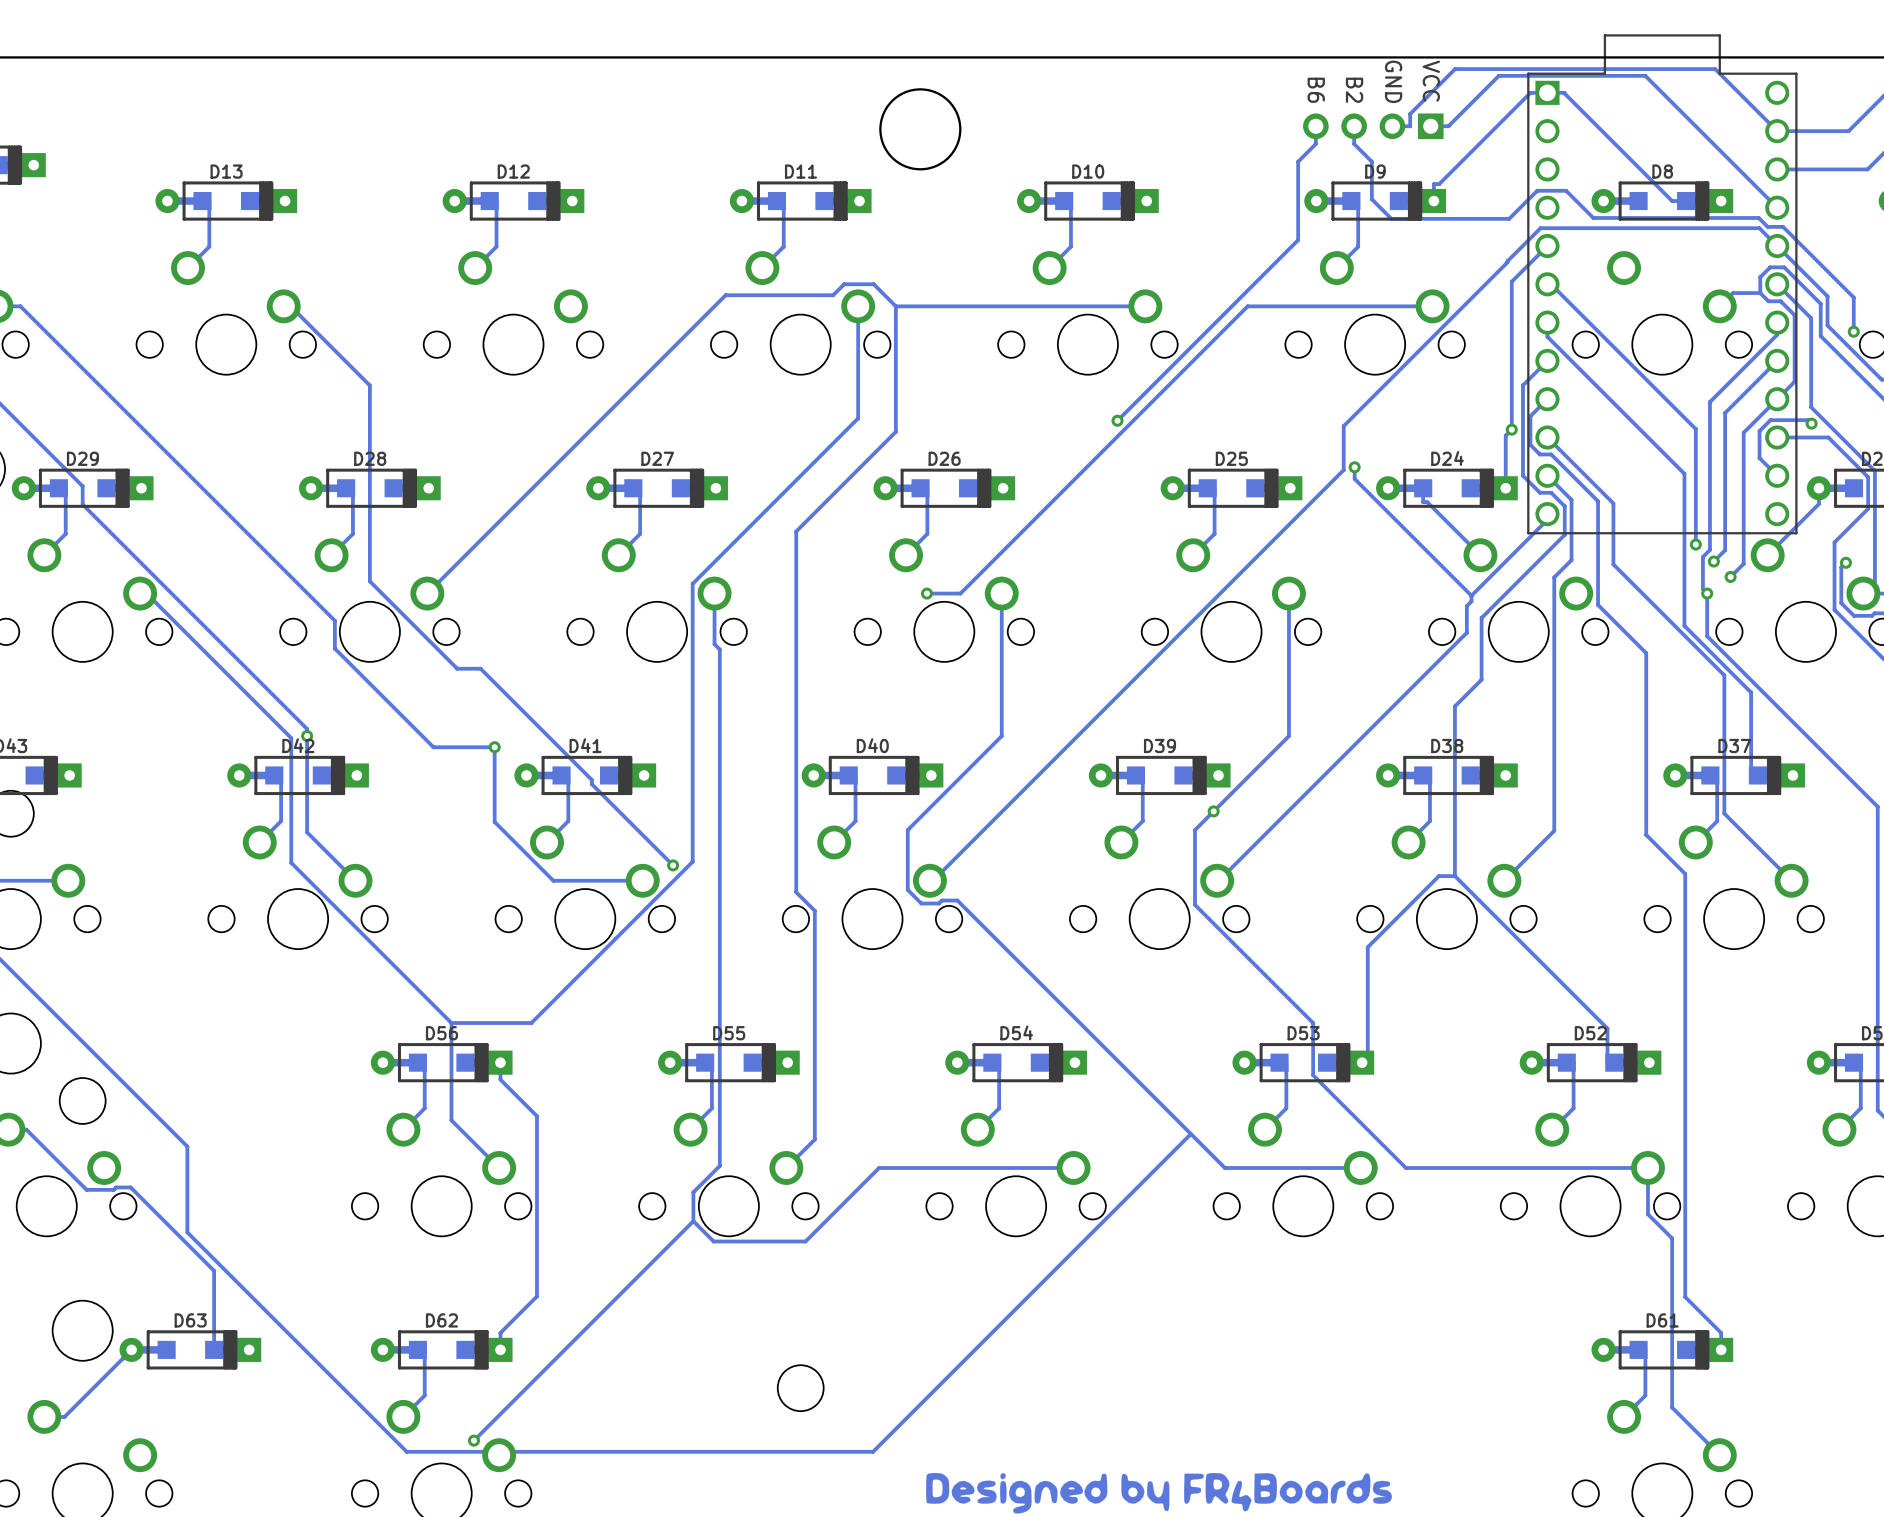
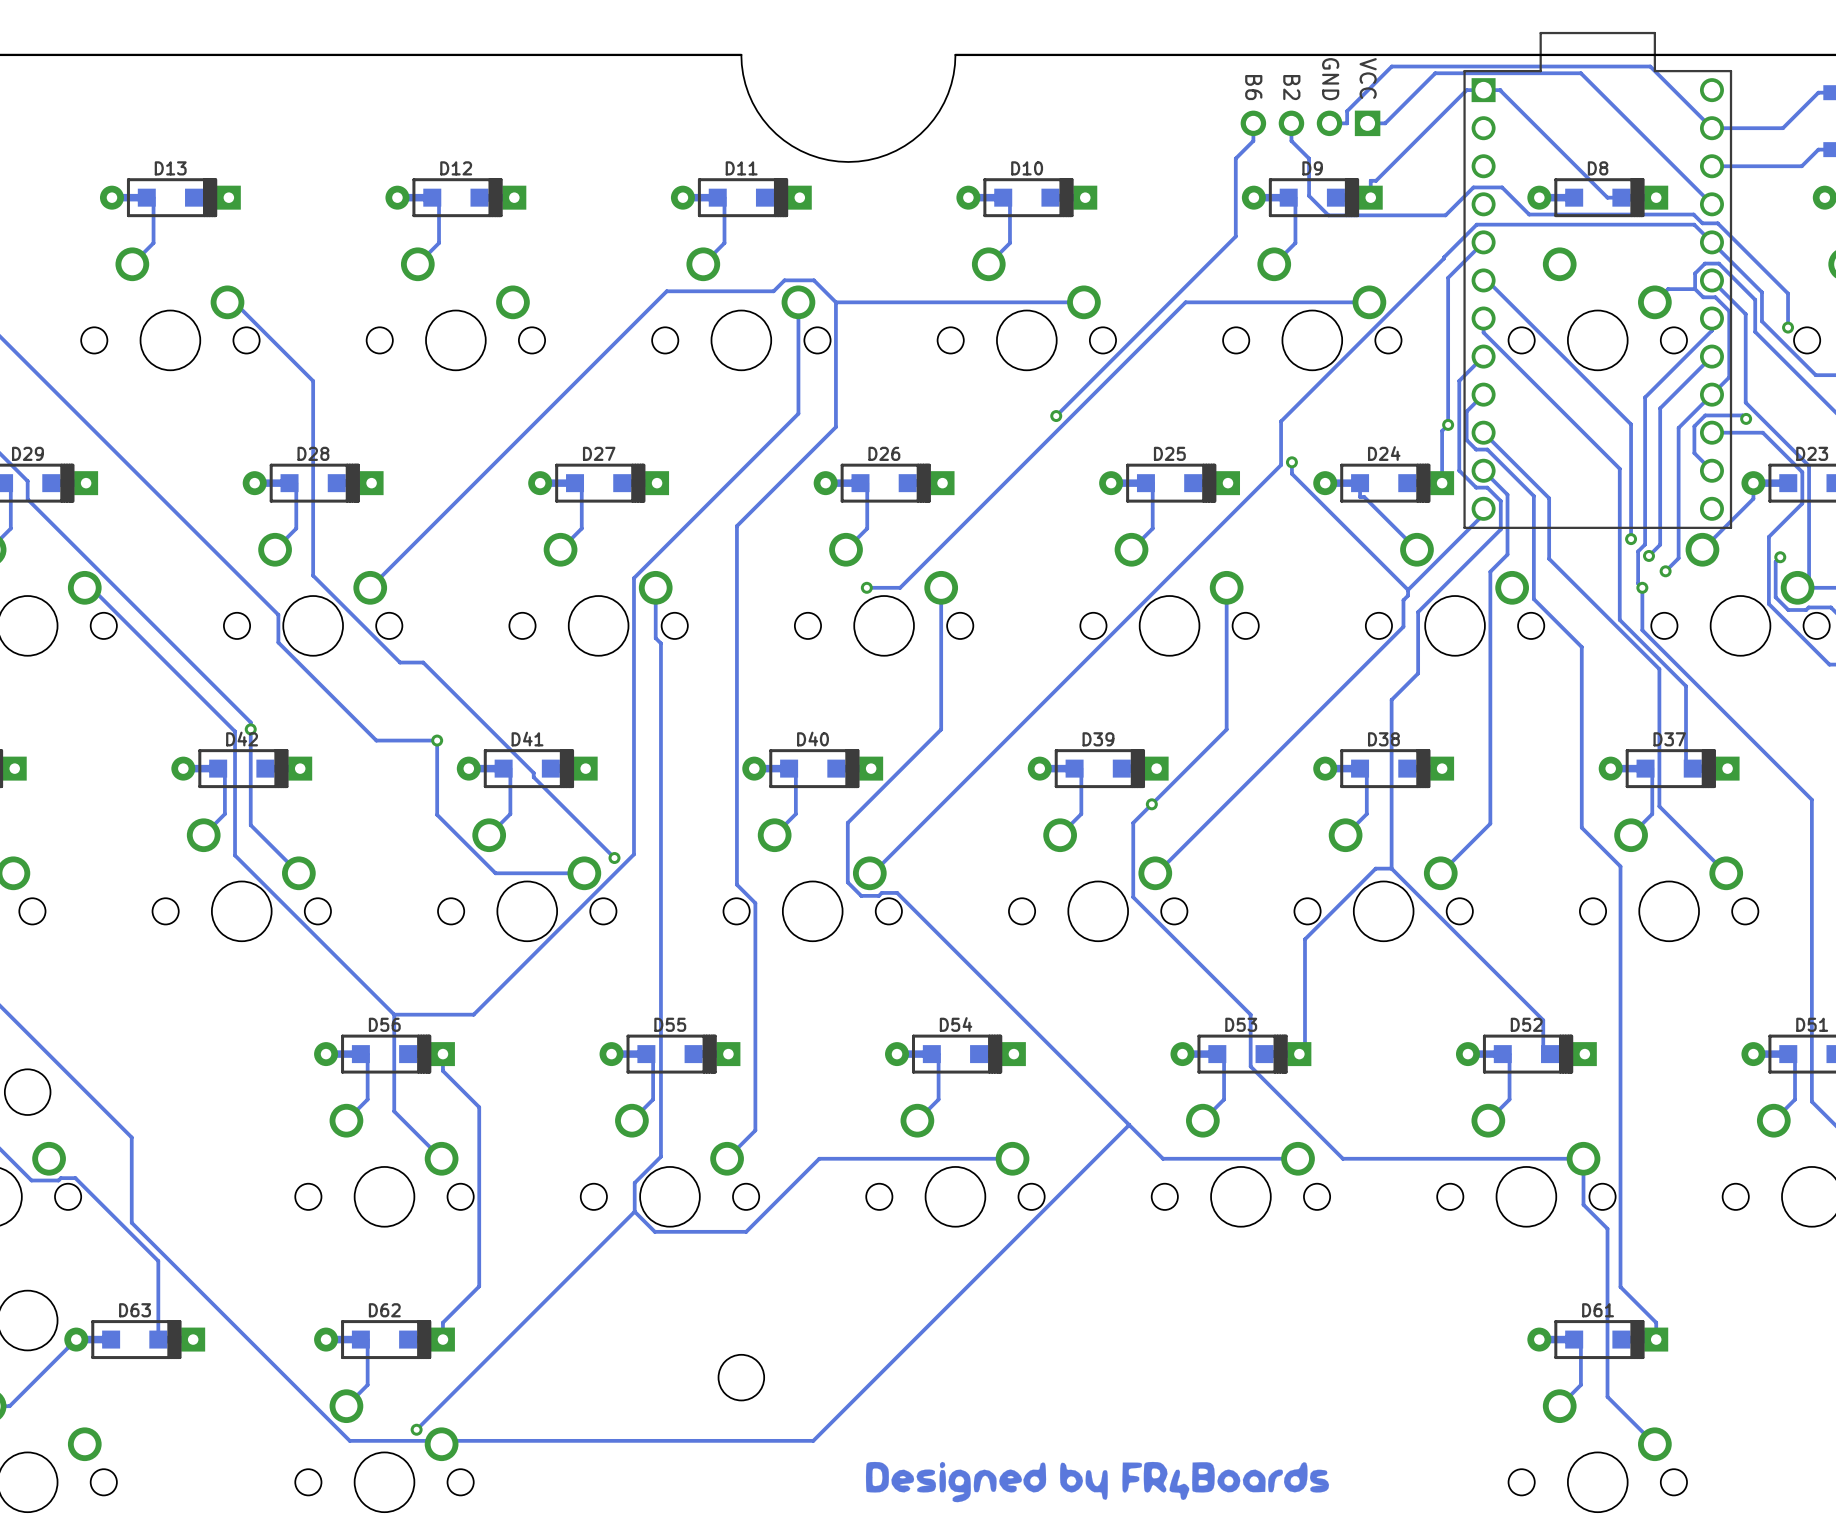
board edge: (1016, 57) (800, 57) -> (955, 54) (953, 74) (948, 93) (933, 119) (920, 134) (904, 145) (887, 154) (868, 160) (848, 161) (828, 160) (809, 154) (792, 145) (776, 134) (762, 119) (748, 93) (743, 74) (741, 54)
round board edge: [879, 88, 962, 171] -> none

